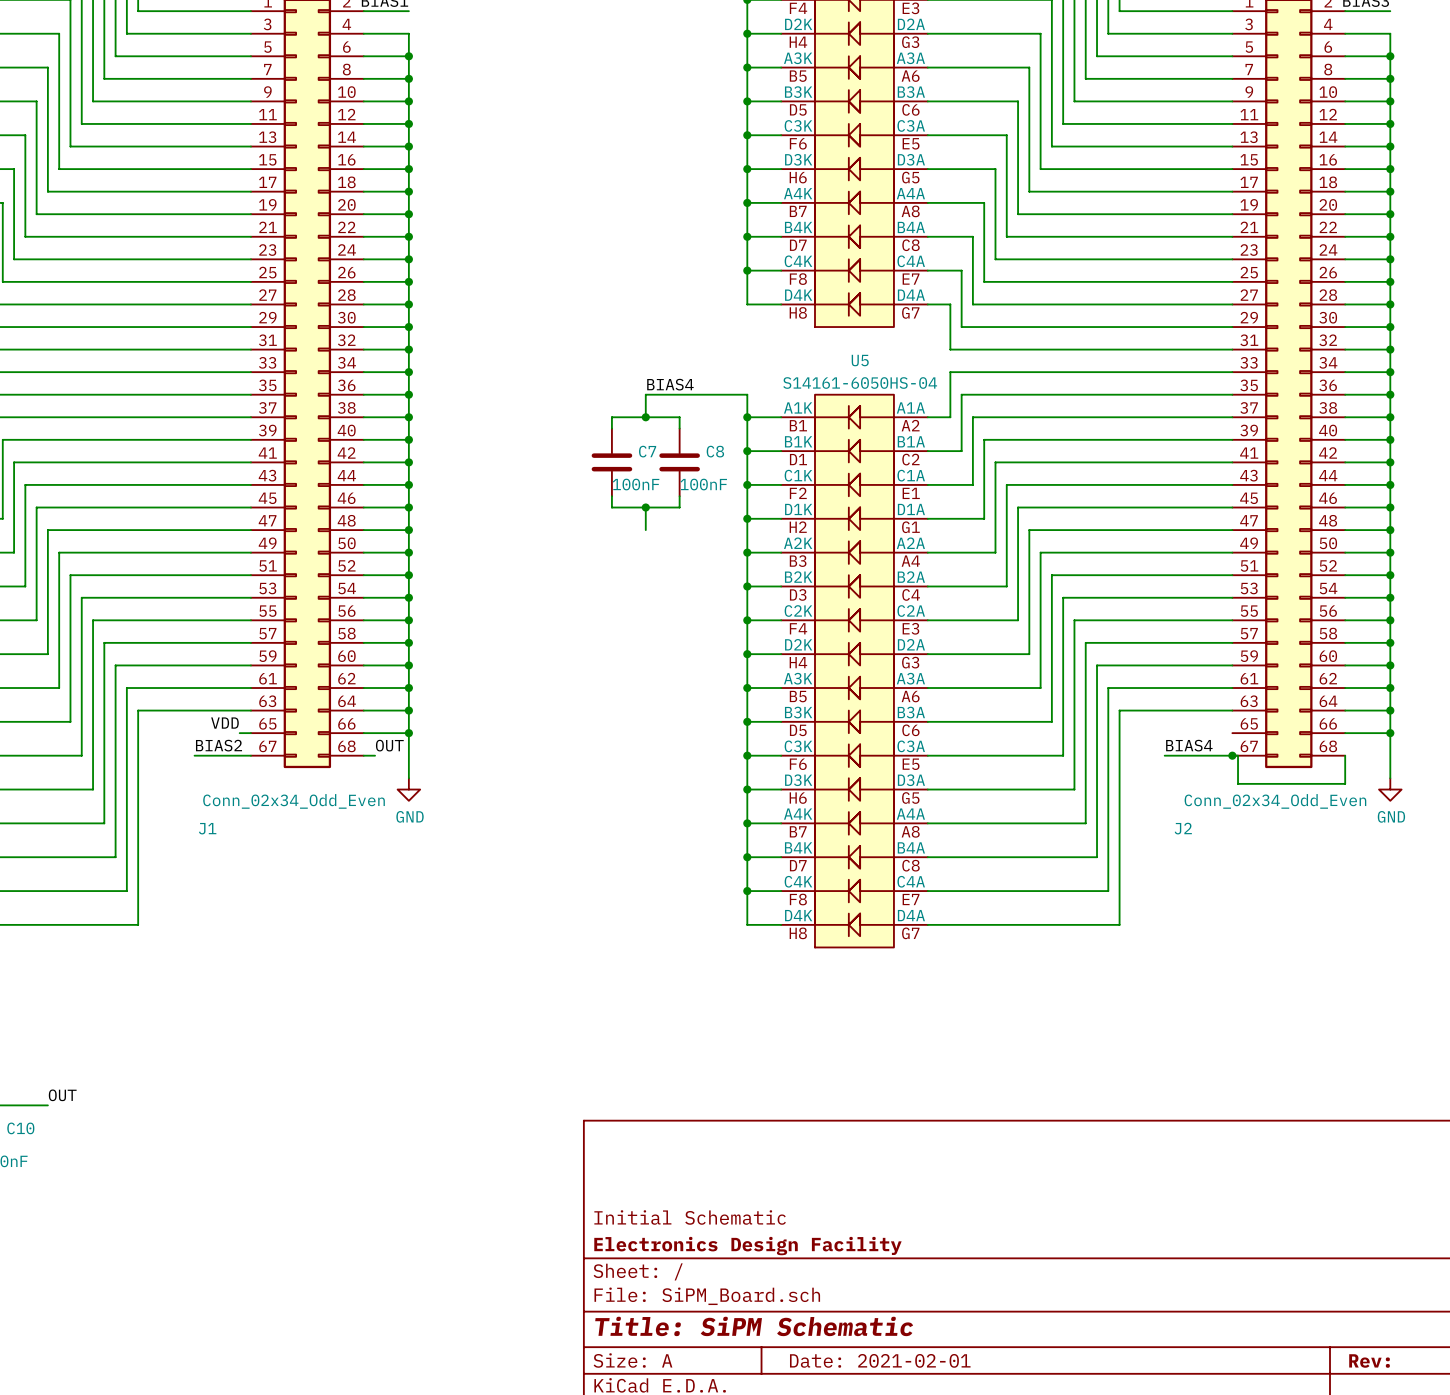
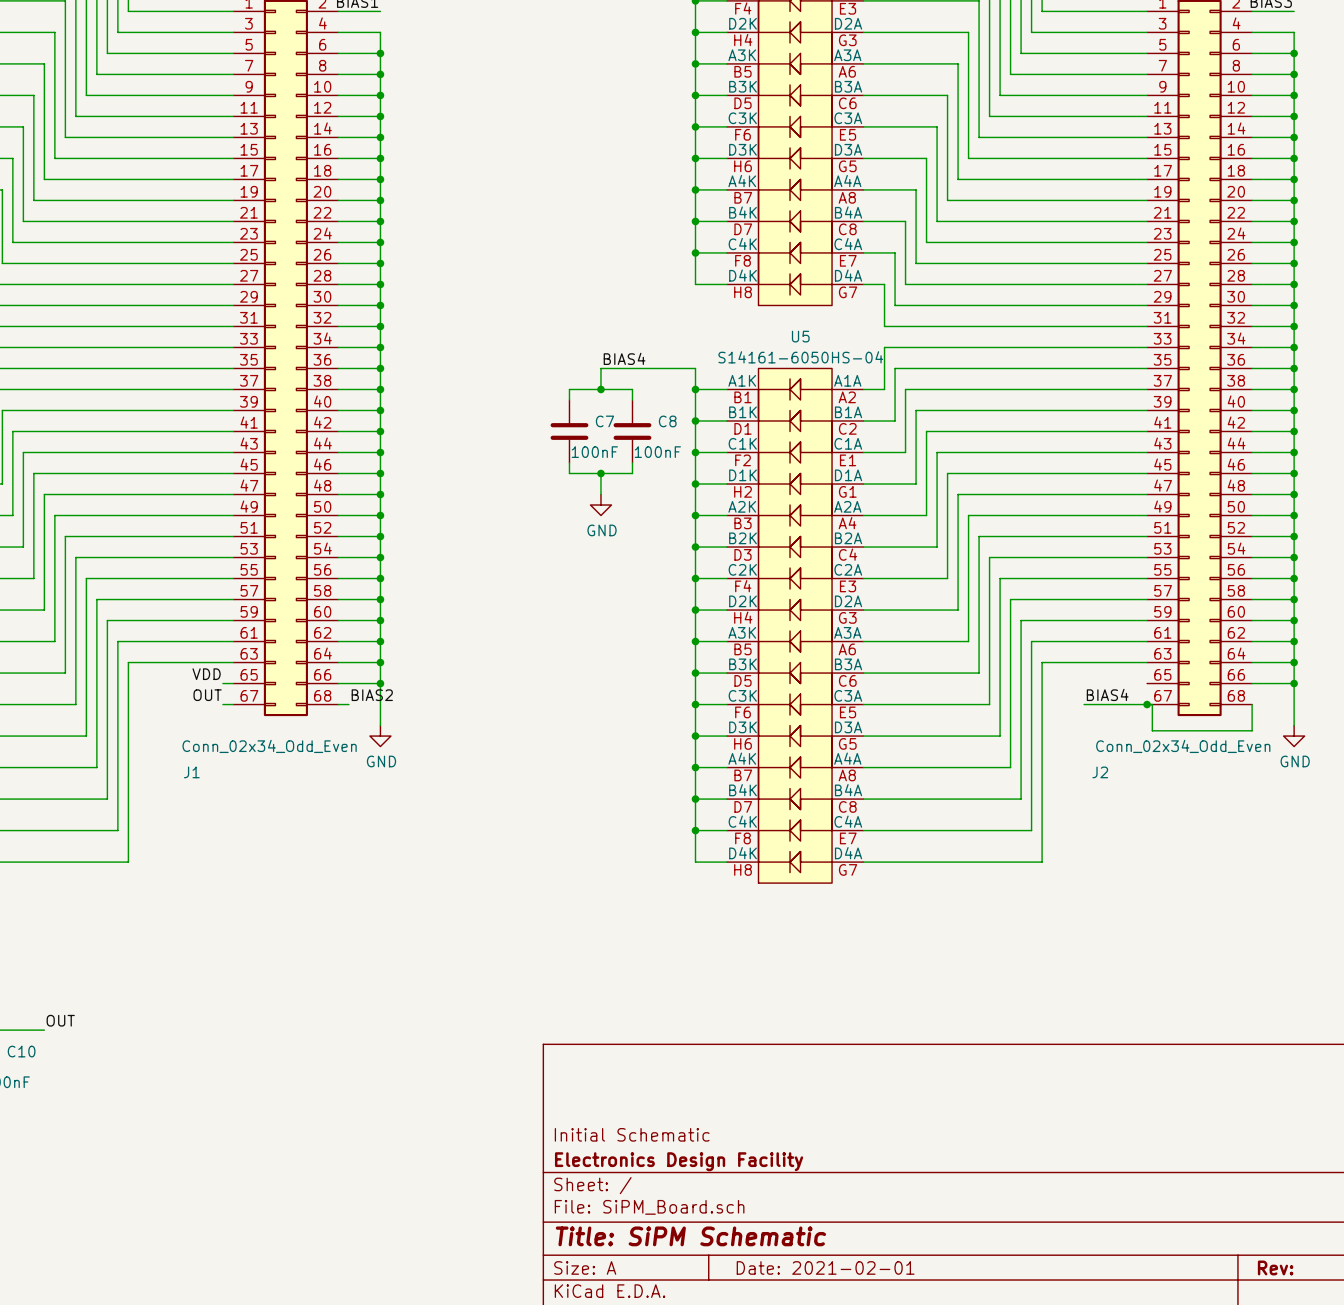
power symbol: none -> GND (600, 505)
label: BIAS2 (219, 745) -> none
label: none -> OUT (207, 695)
label: OUT (389, 745) -> BIAS2 (372, 695)
wire: (194, 755) (239, 755) -> none

